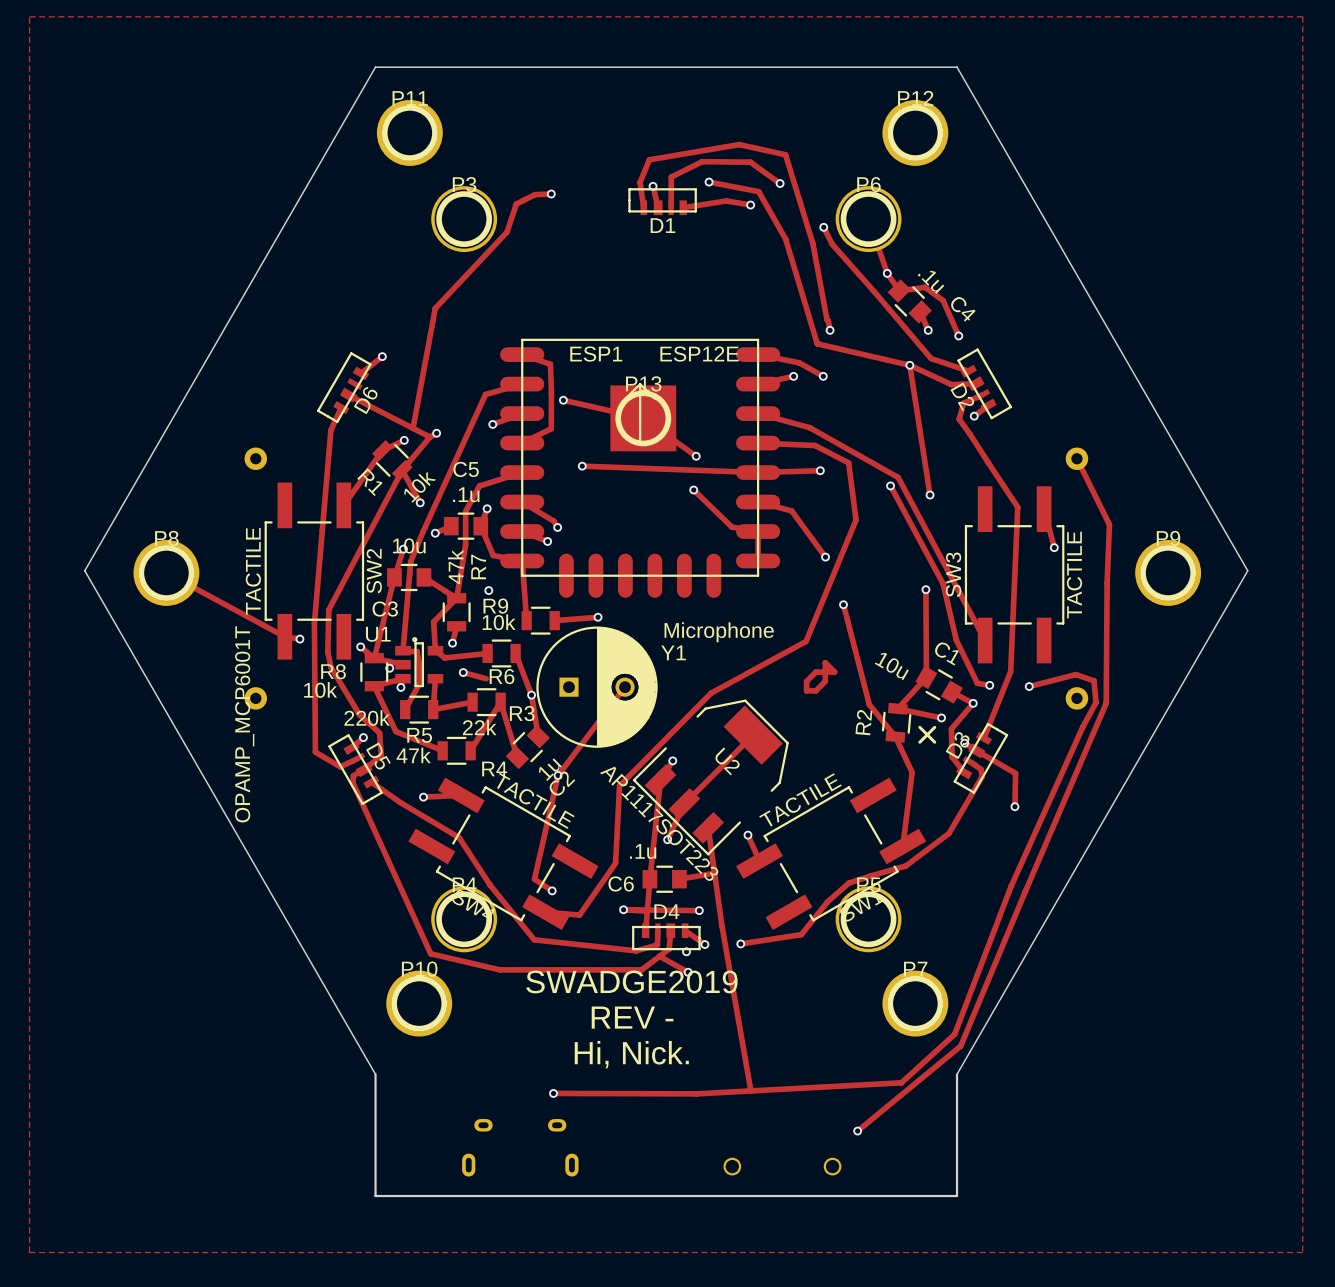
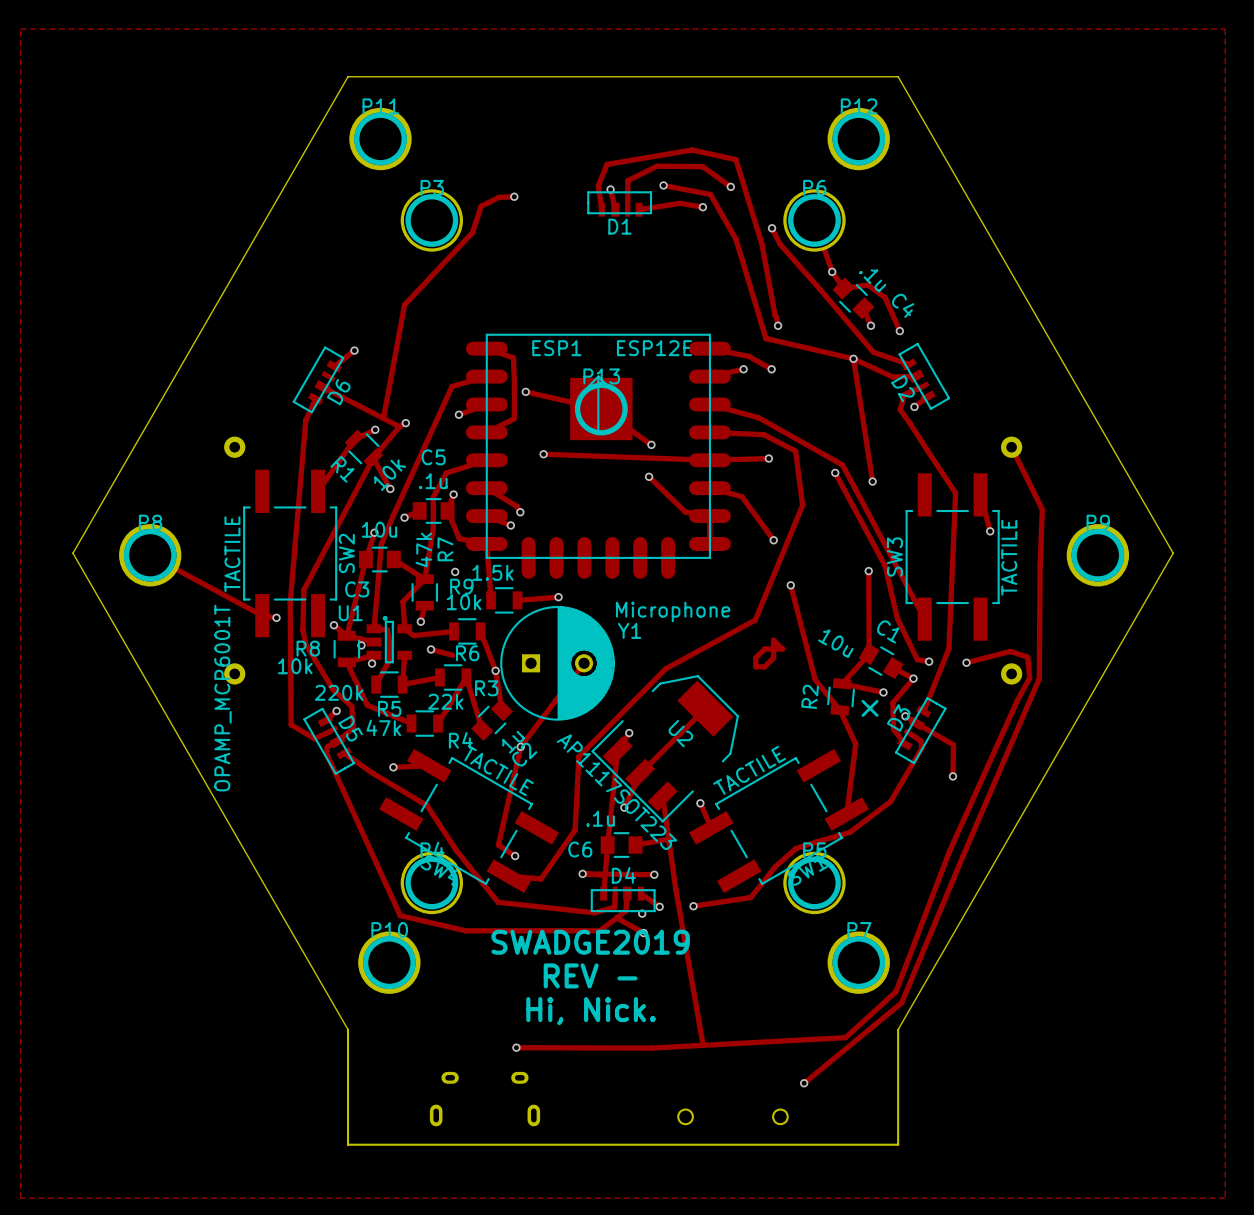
R9 value: none -> 1.5k (492, 572)

